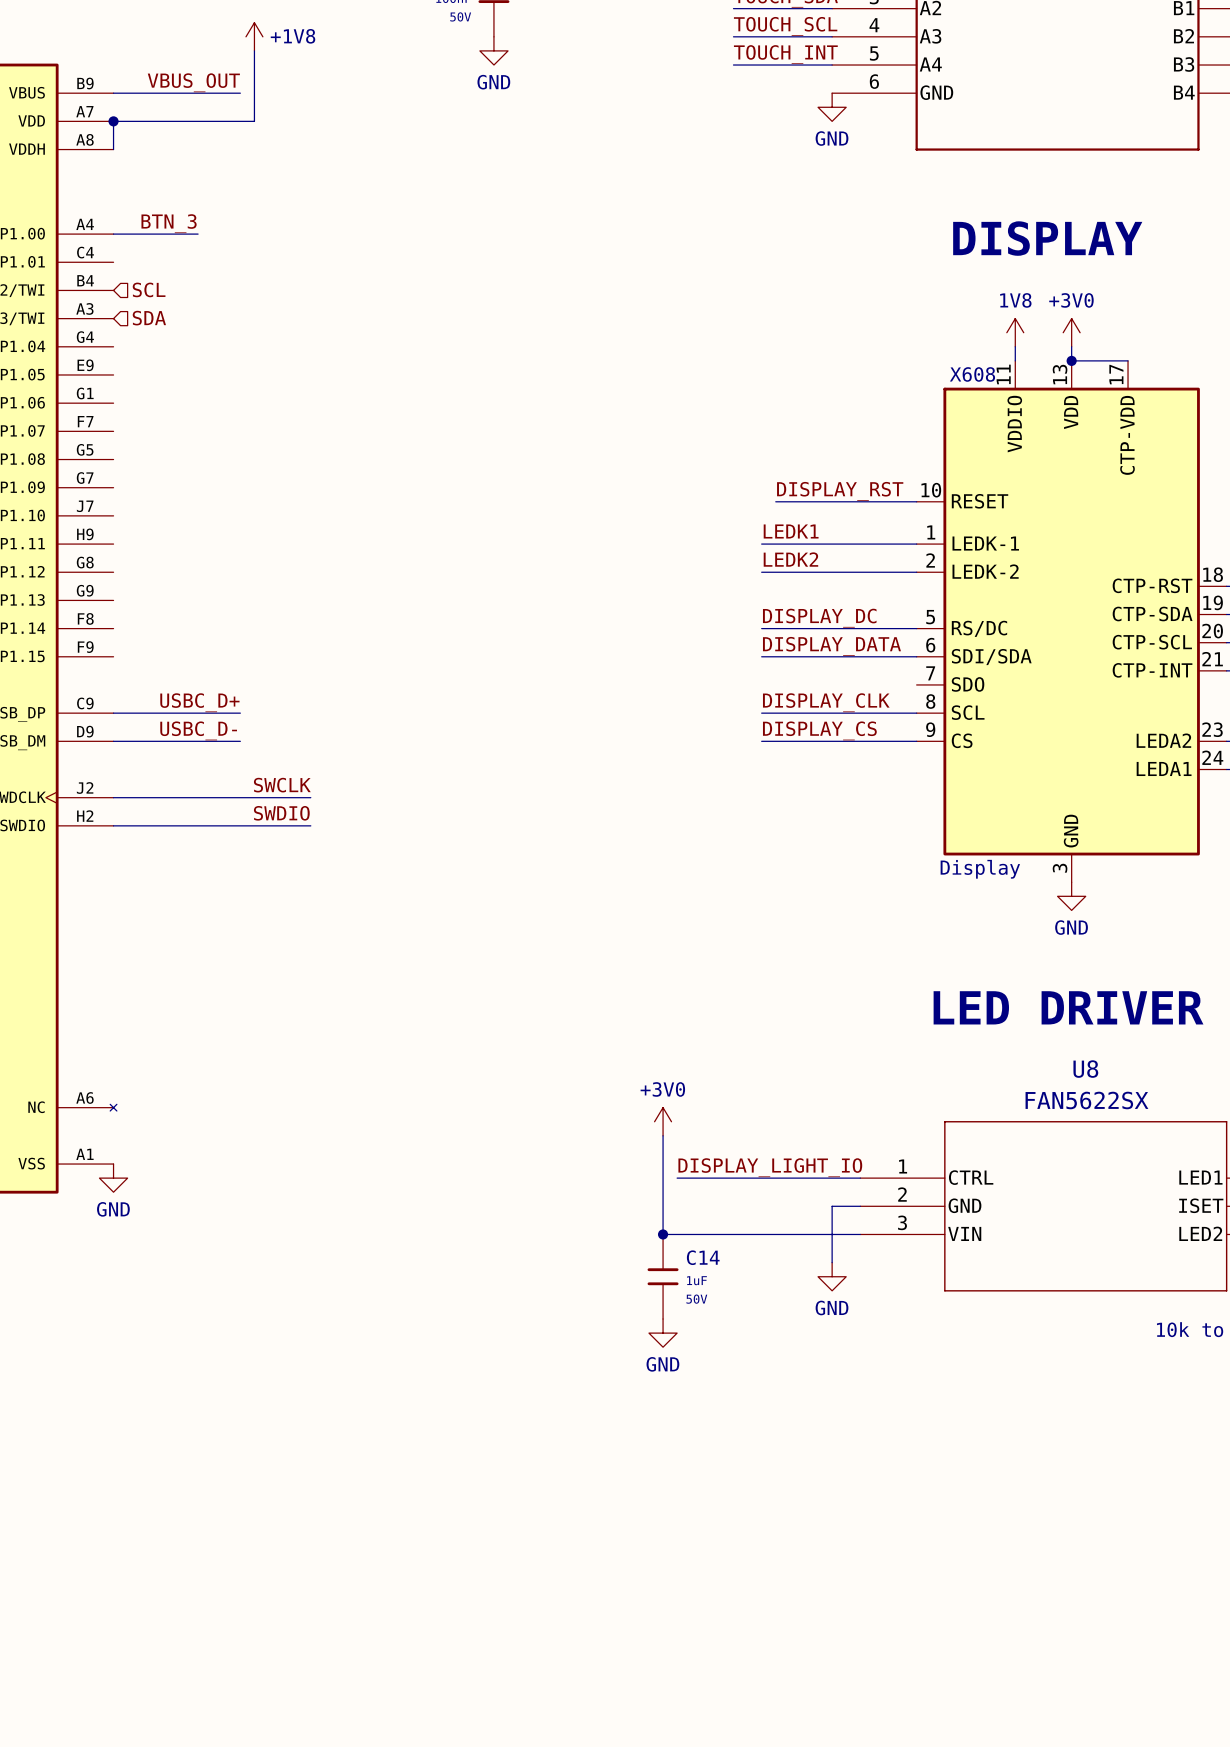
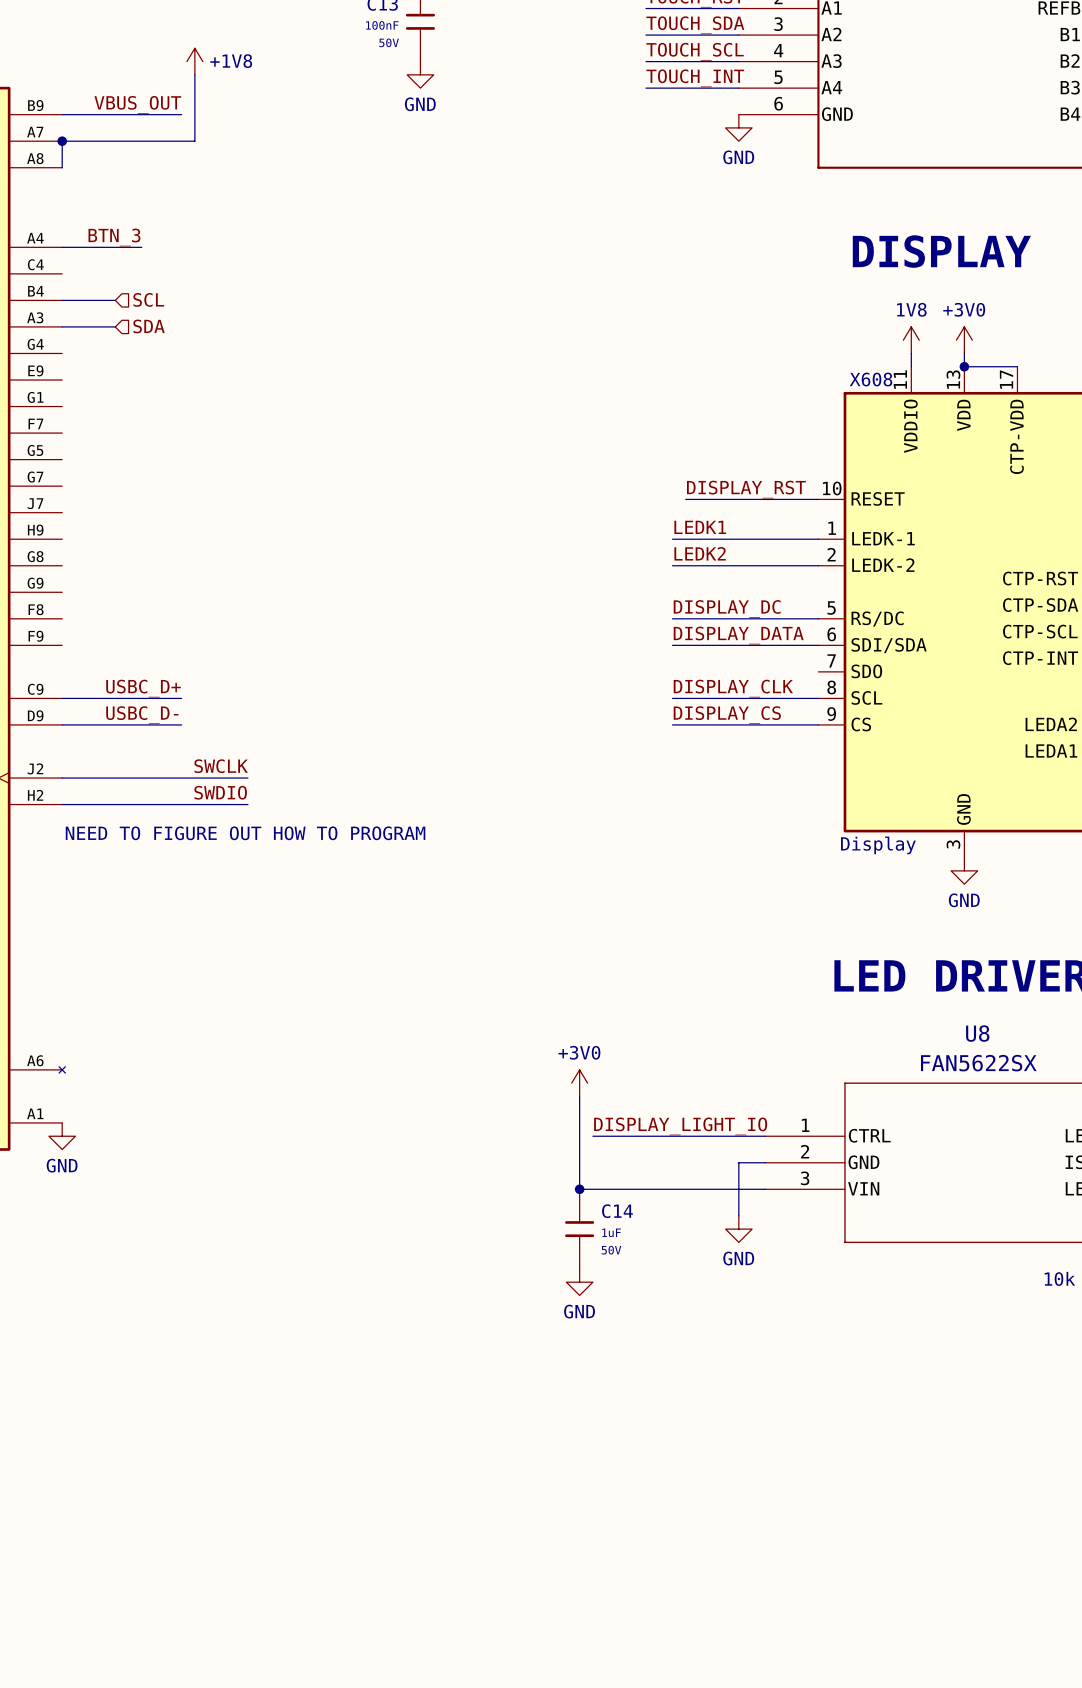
hierarchical label position: SCL (149, 289) -> SCL (148, 299)
wire: none -> (62, 300) (115, 300)
wire: none -> (62, 326) (115, 326)
hierarchical label position: SDA (149, 318) -> SDA (149, 326)
text: none -> NEED TO FIGURE OUT HOW TO PROGRAM (245, 833)

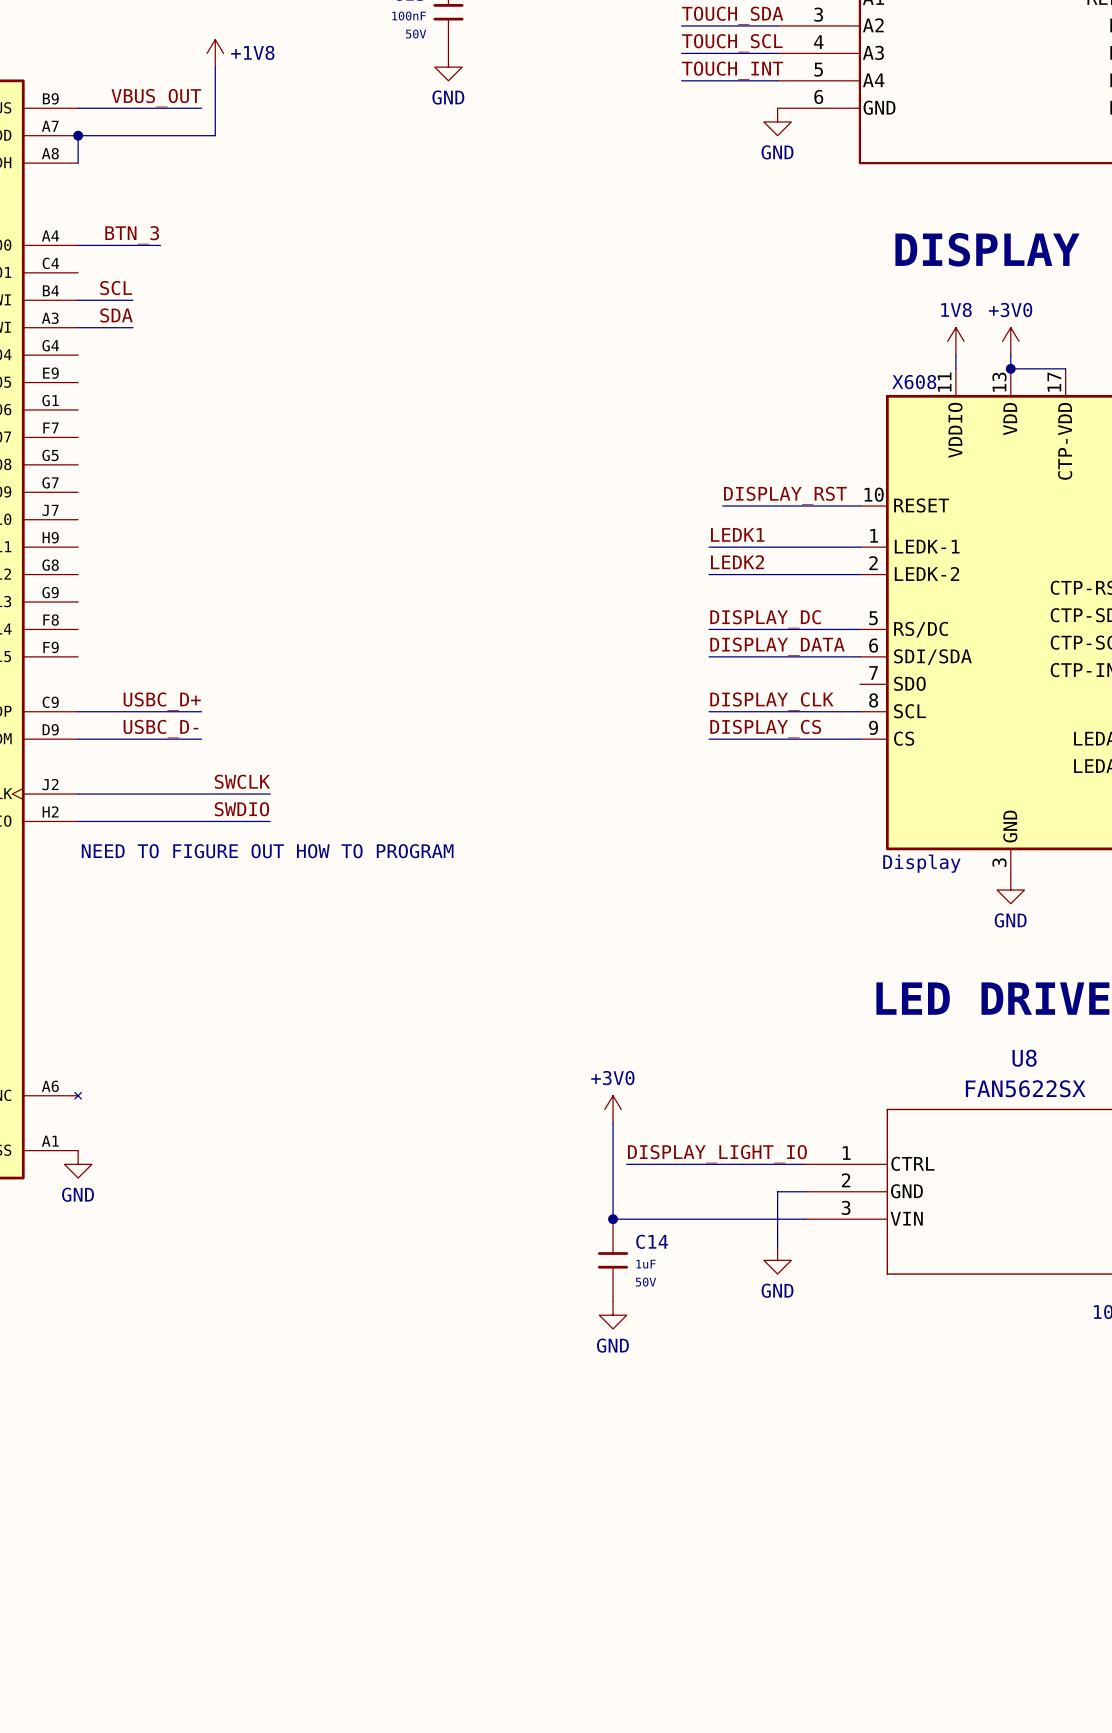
label: none -> SCL (116, 288)
hierarchical label: SCL (148, 299) -> none
label: none -> SDA (116, 315)
hierarchical label: SDA (149, 326) -> none

